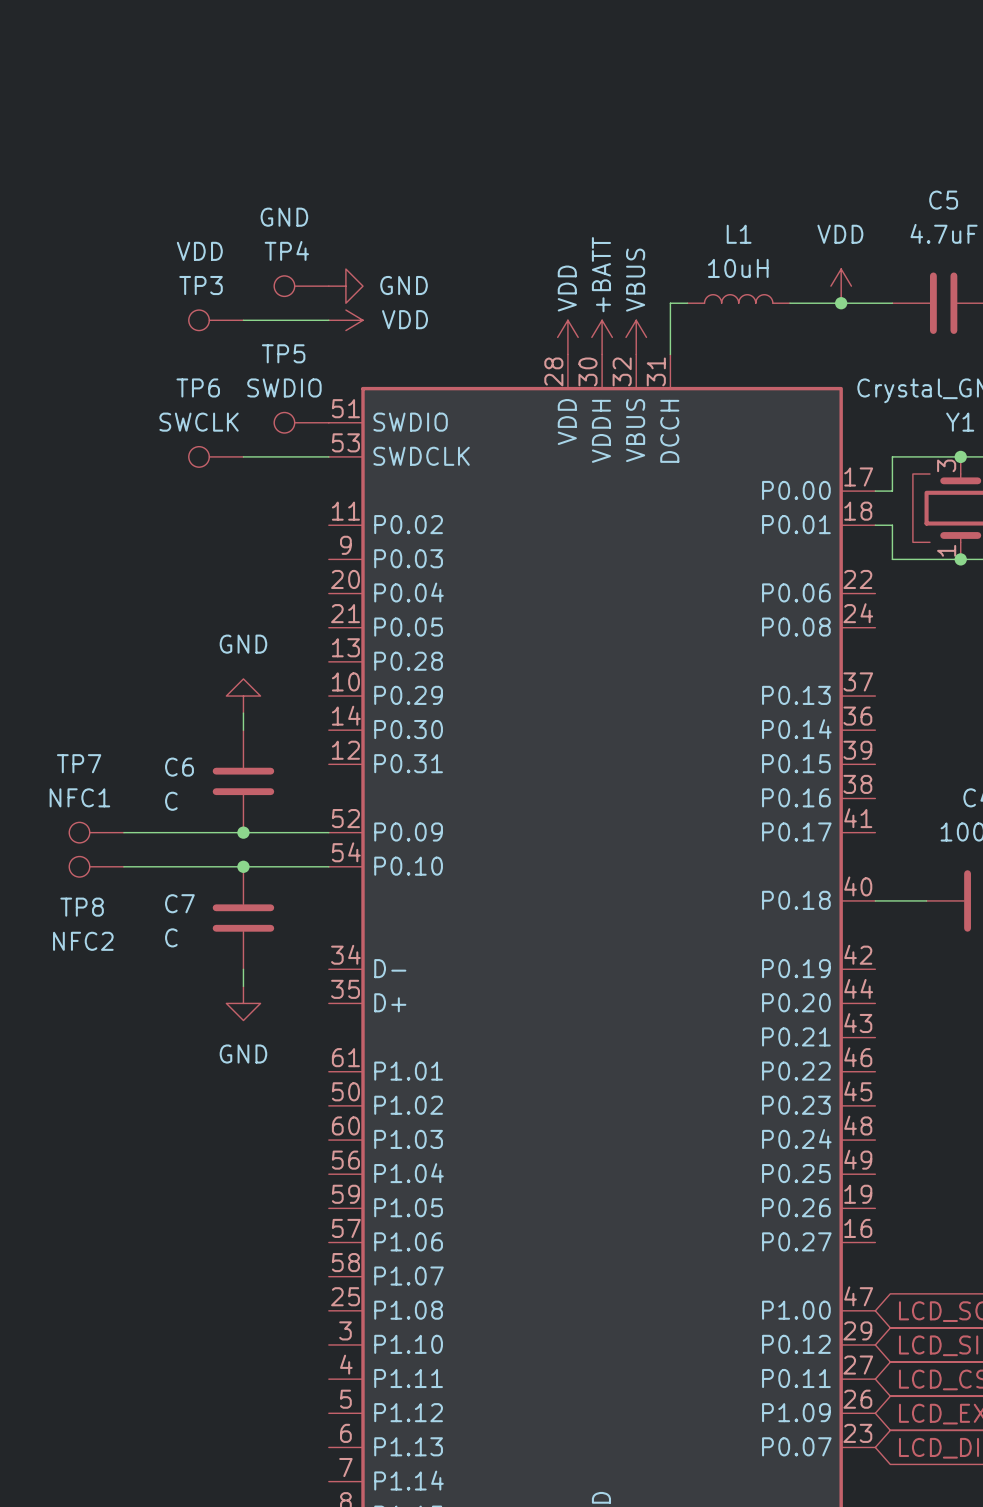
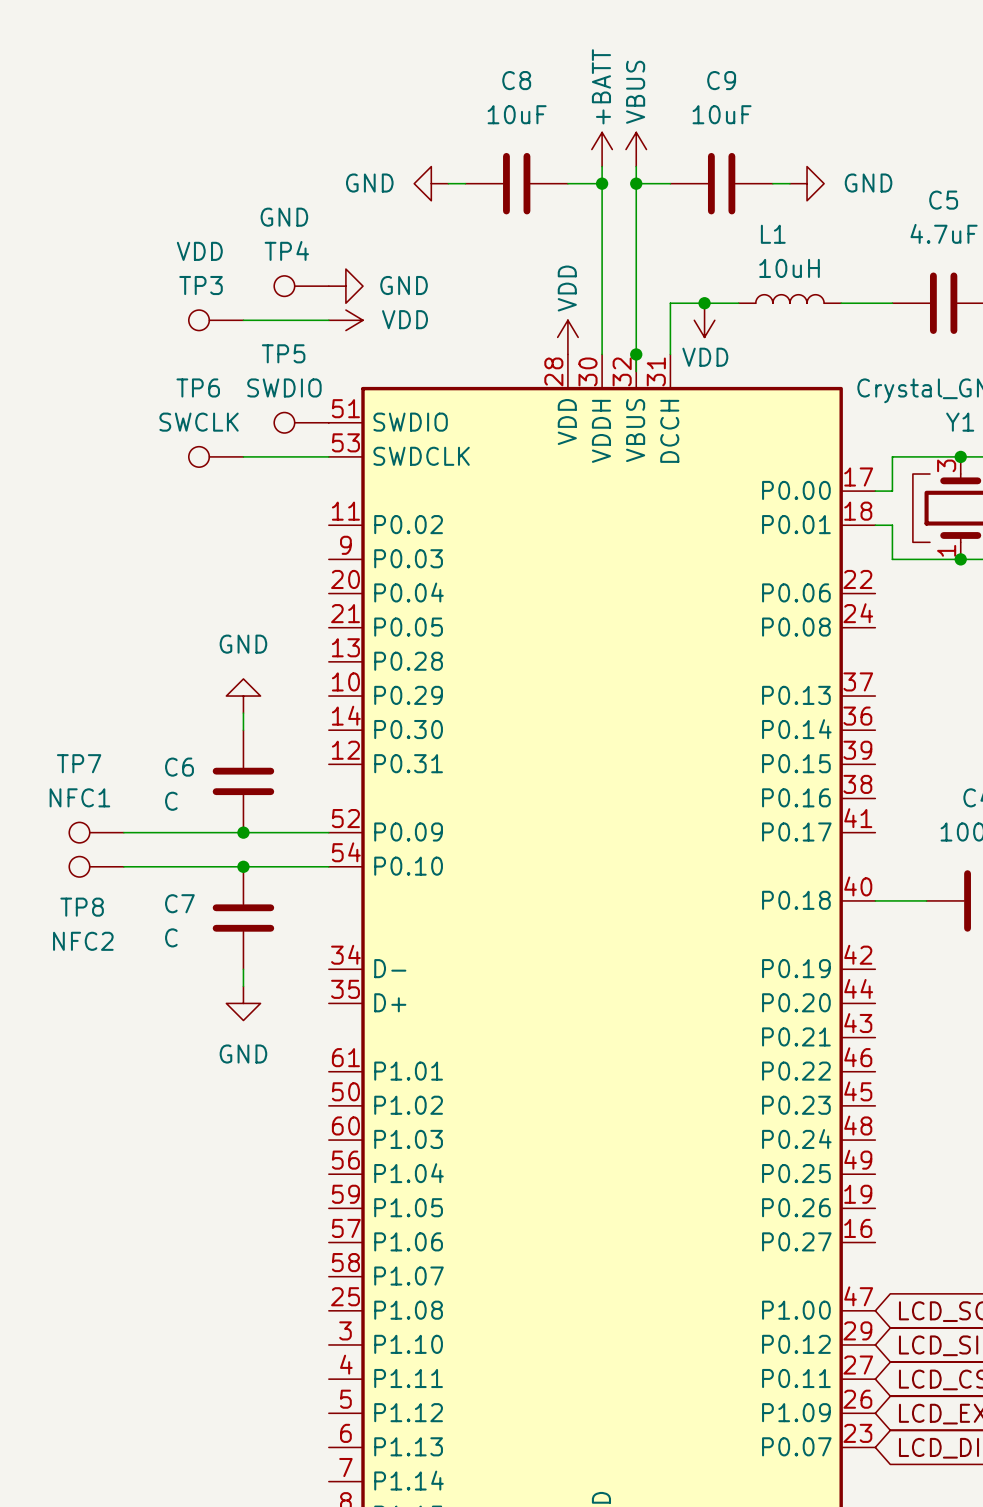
wire: none -> (602, 166) (602, 354)
wire: none -> (636, 166) (636, 371)
power symbol: none -> GND (431, 183)
wire: none -> (448, 183) (465, 183)
C8: none -> 10uF (516, 183)
wire: none -> (567, 183) (602, 183)
junction: none -> (602, 183)
wire: none -> (636, 183) (670, 183)
junction: none -> (636, 183)
C9: none -> 10uF (721, 183)
wire: none -> (772, 183) (789, 183)
power symbol: none -> GND (807, 183)
L1 name position: L1 (739, 234) -> L1 (773, 234)
power symbol rotation: 0° (841, 286) -> 180° (704, 320)
power symbol position: VDD (841, 286) -> VDD (704, 320)
L1 position: (738, 298) -> (789, 298)
junction: none -> (704, 303)
wire: (789, 303) (841, 303) -> (687, 303) (738, 303)
junction: (841, 303) -> none
power symbol position: +BATT (602, 337) -> +BATT (602, 149)
power symbol position: VBUS (636, 337) -> VBUS (636, 149)
junction: none -> (636, 354)

